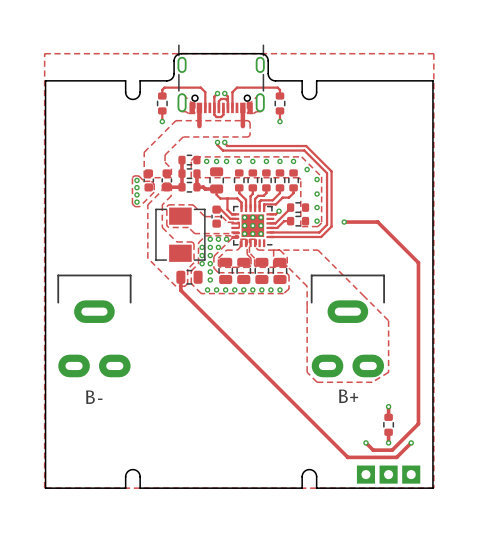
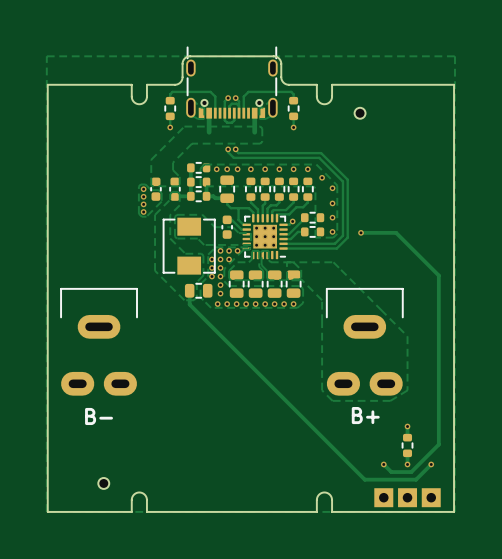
part: none -> (360, 113)
part: none -> (103, 483)

